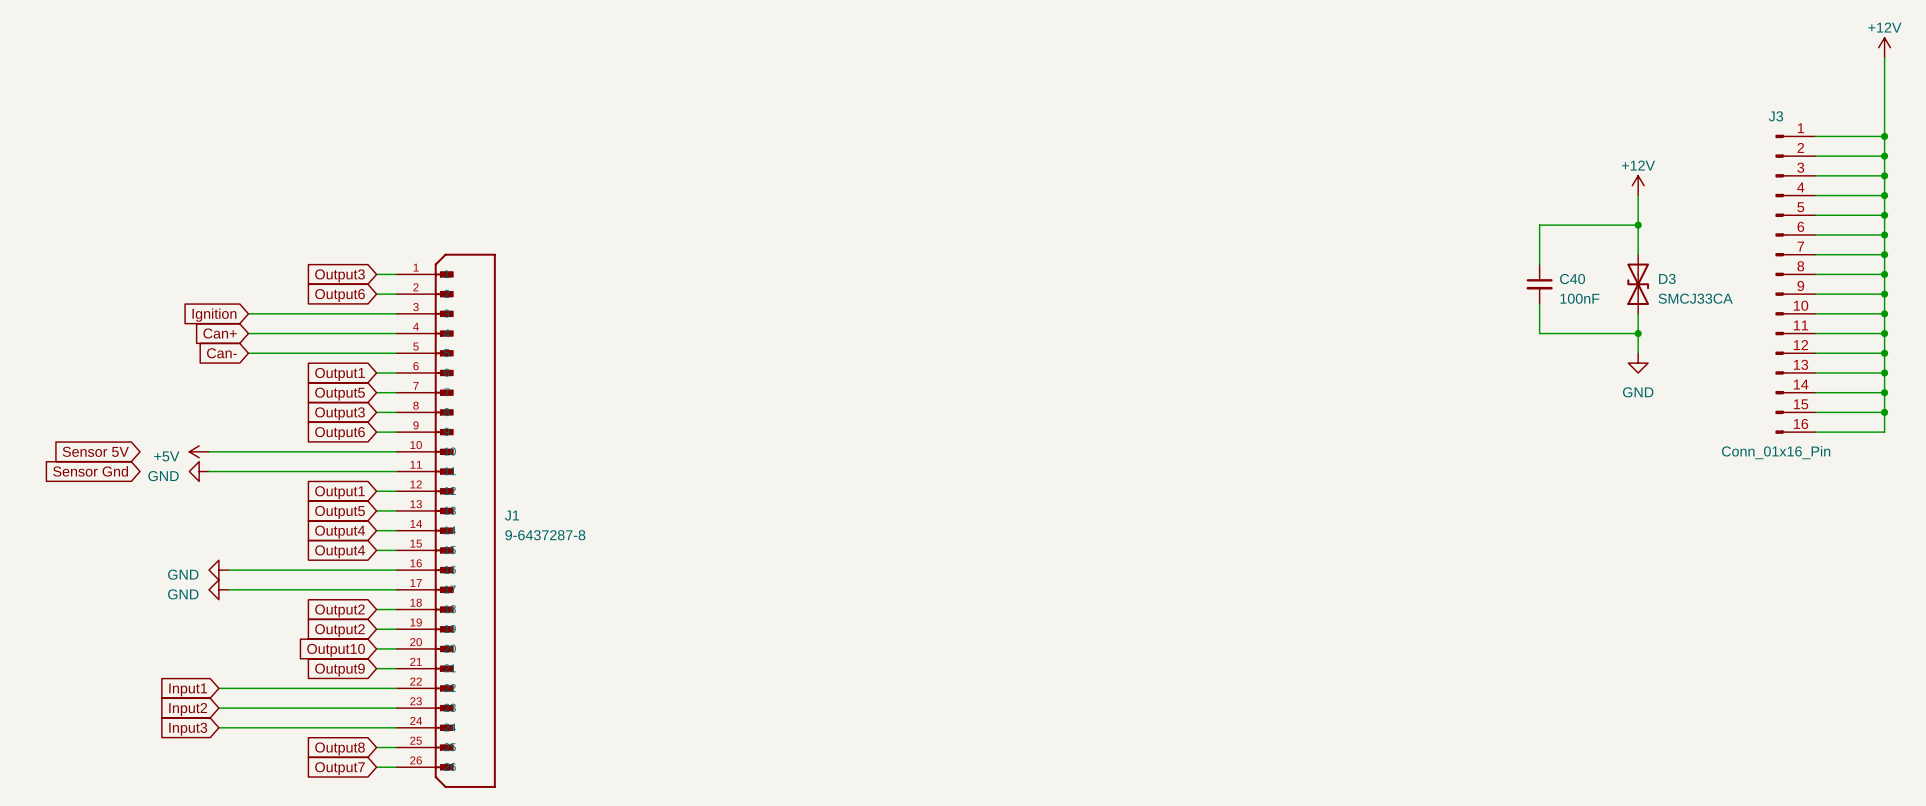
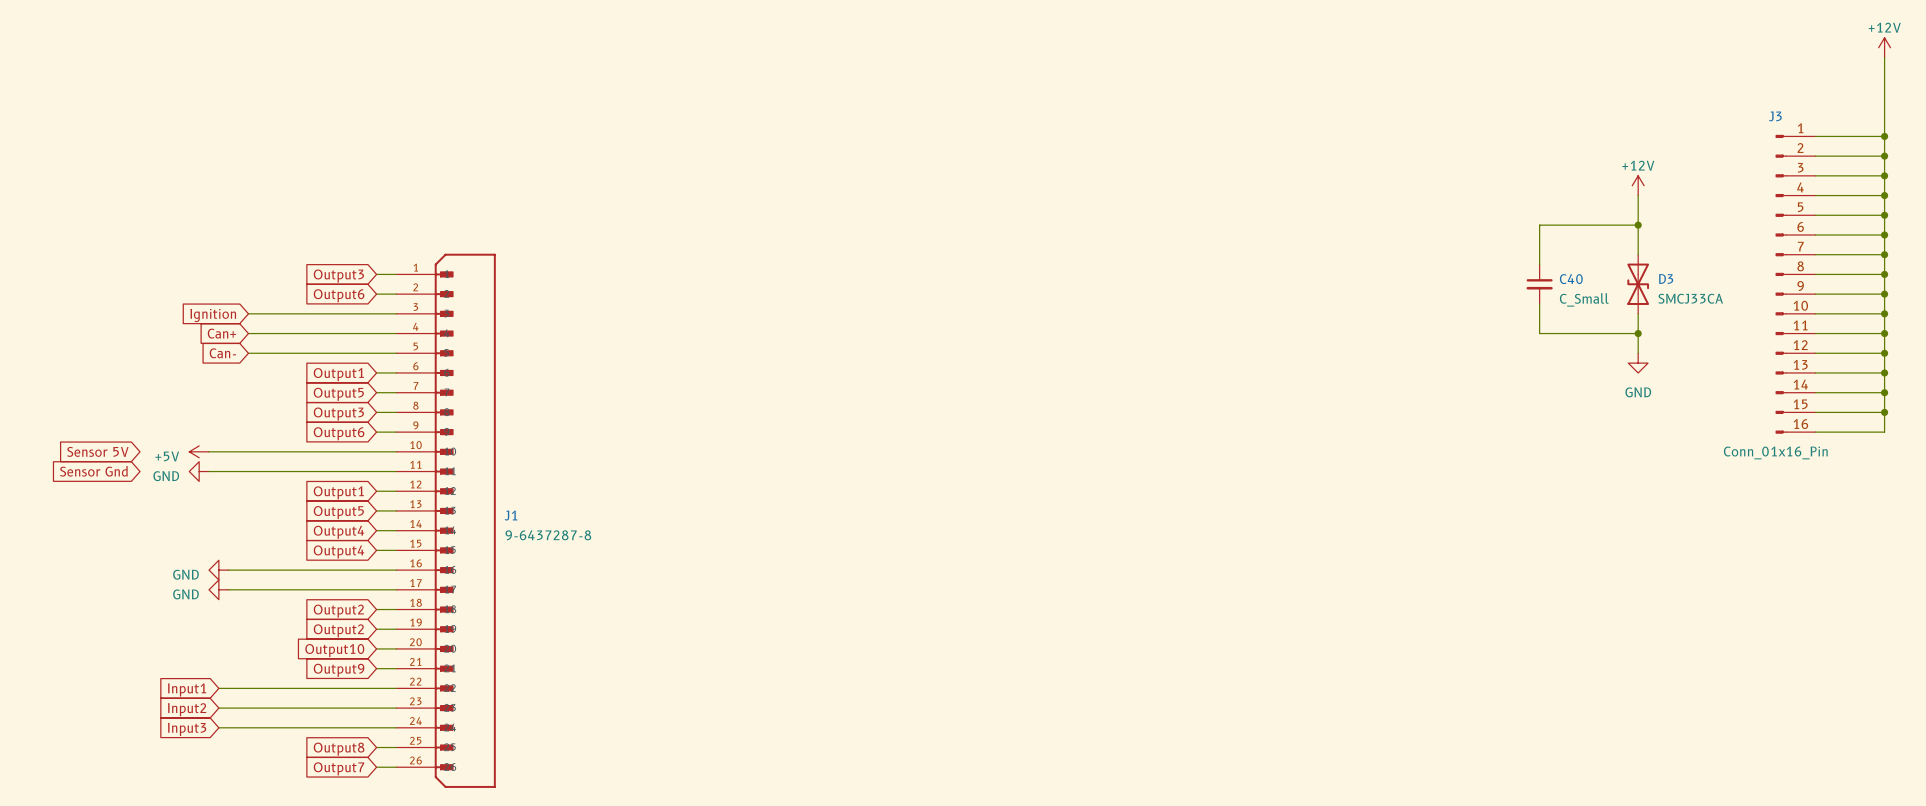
C40 value: 100nF (1579, 298) -> C_Small (1584, 299)

